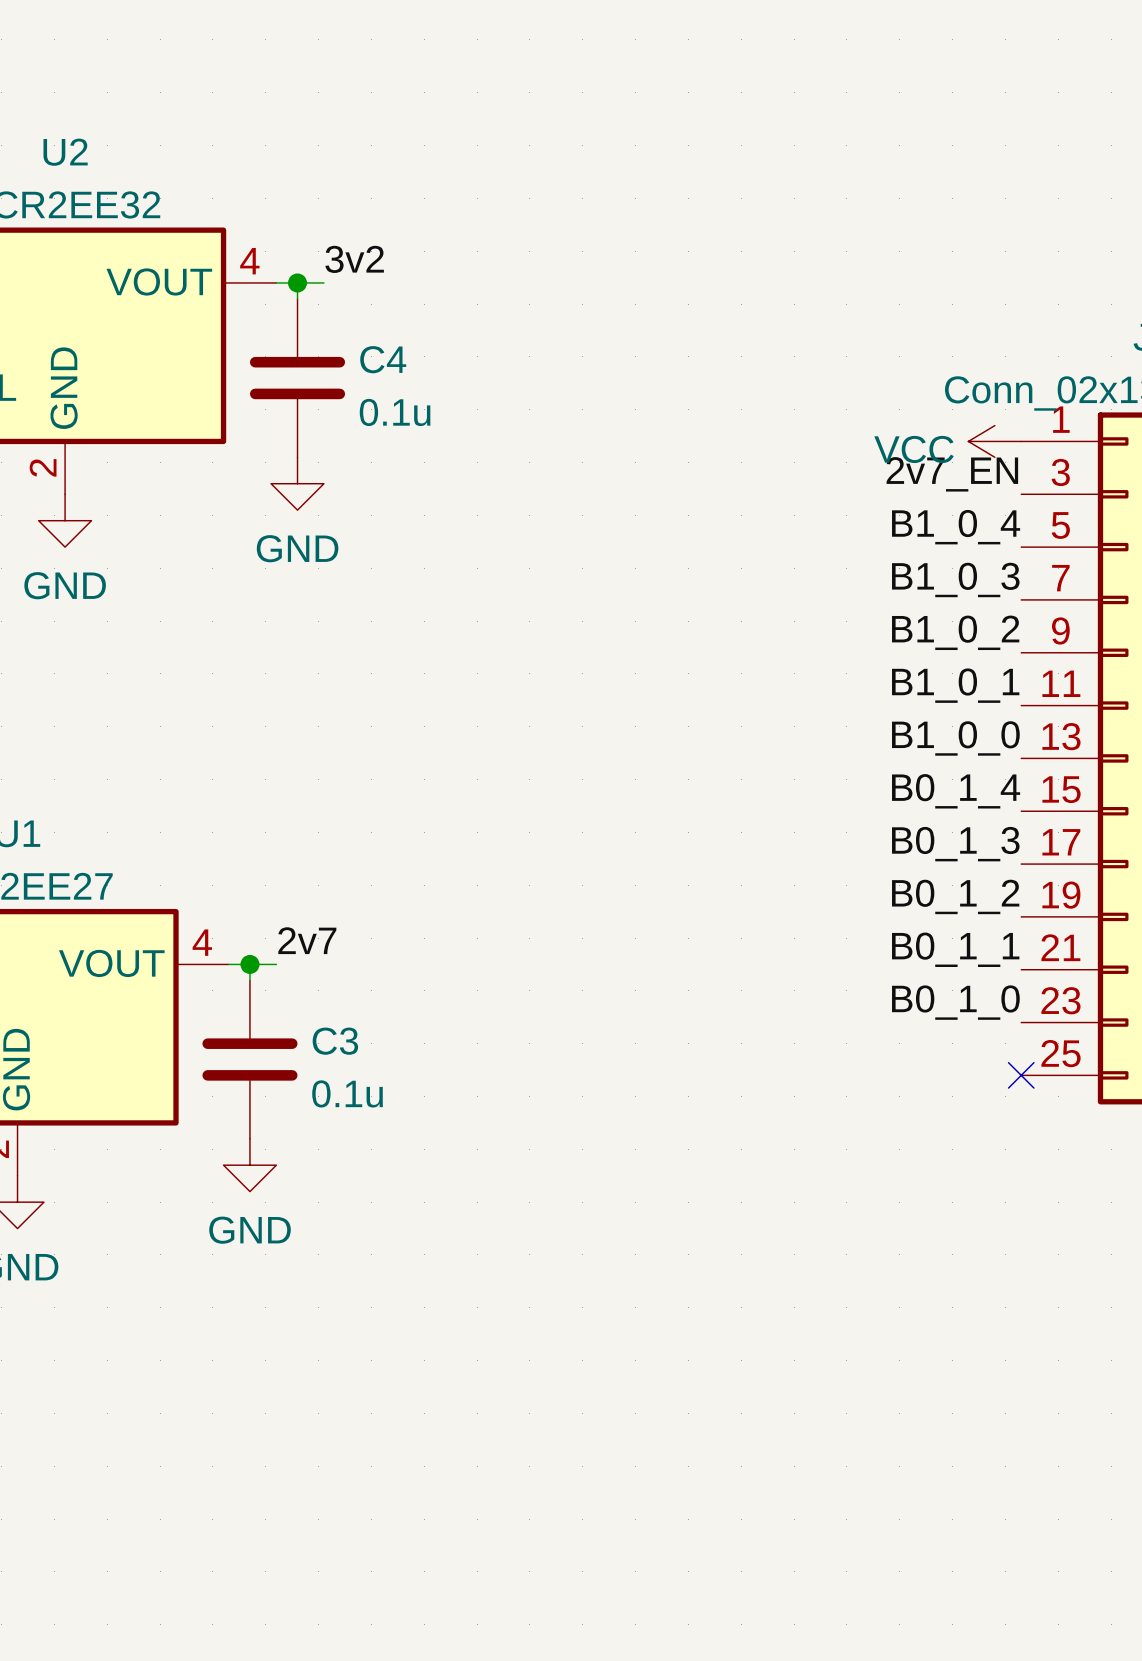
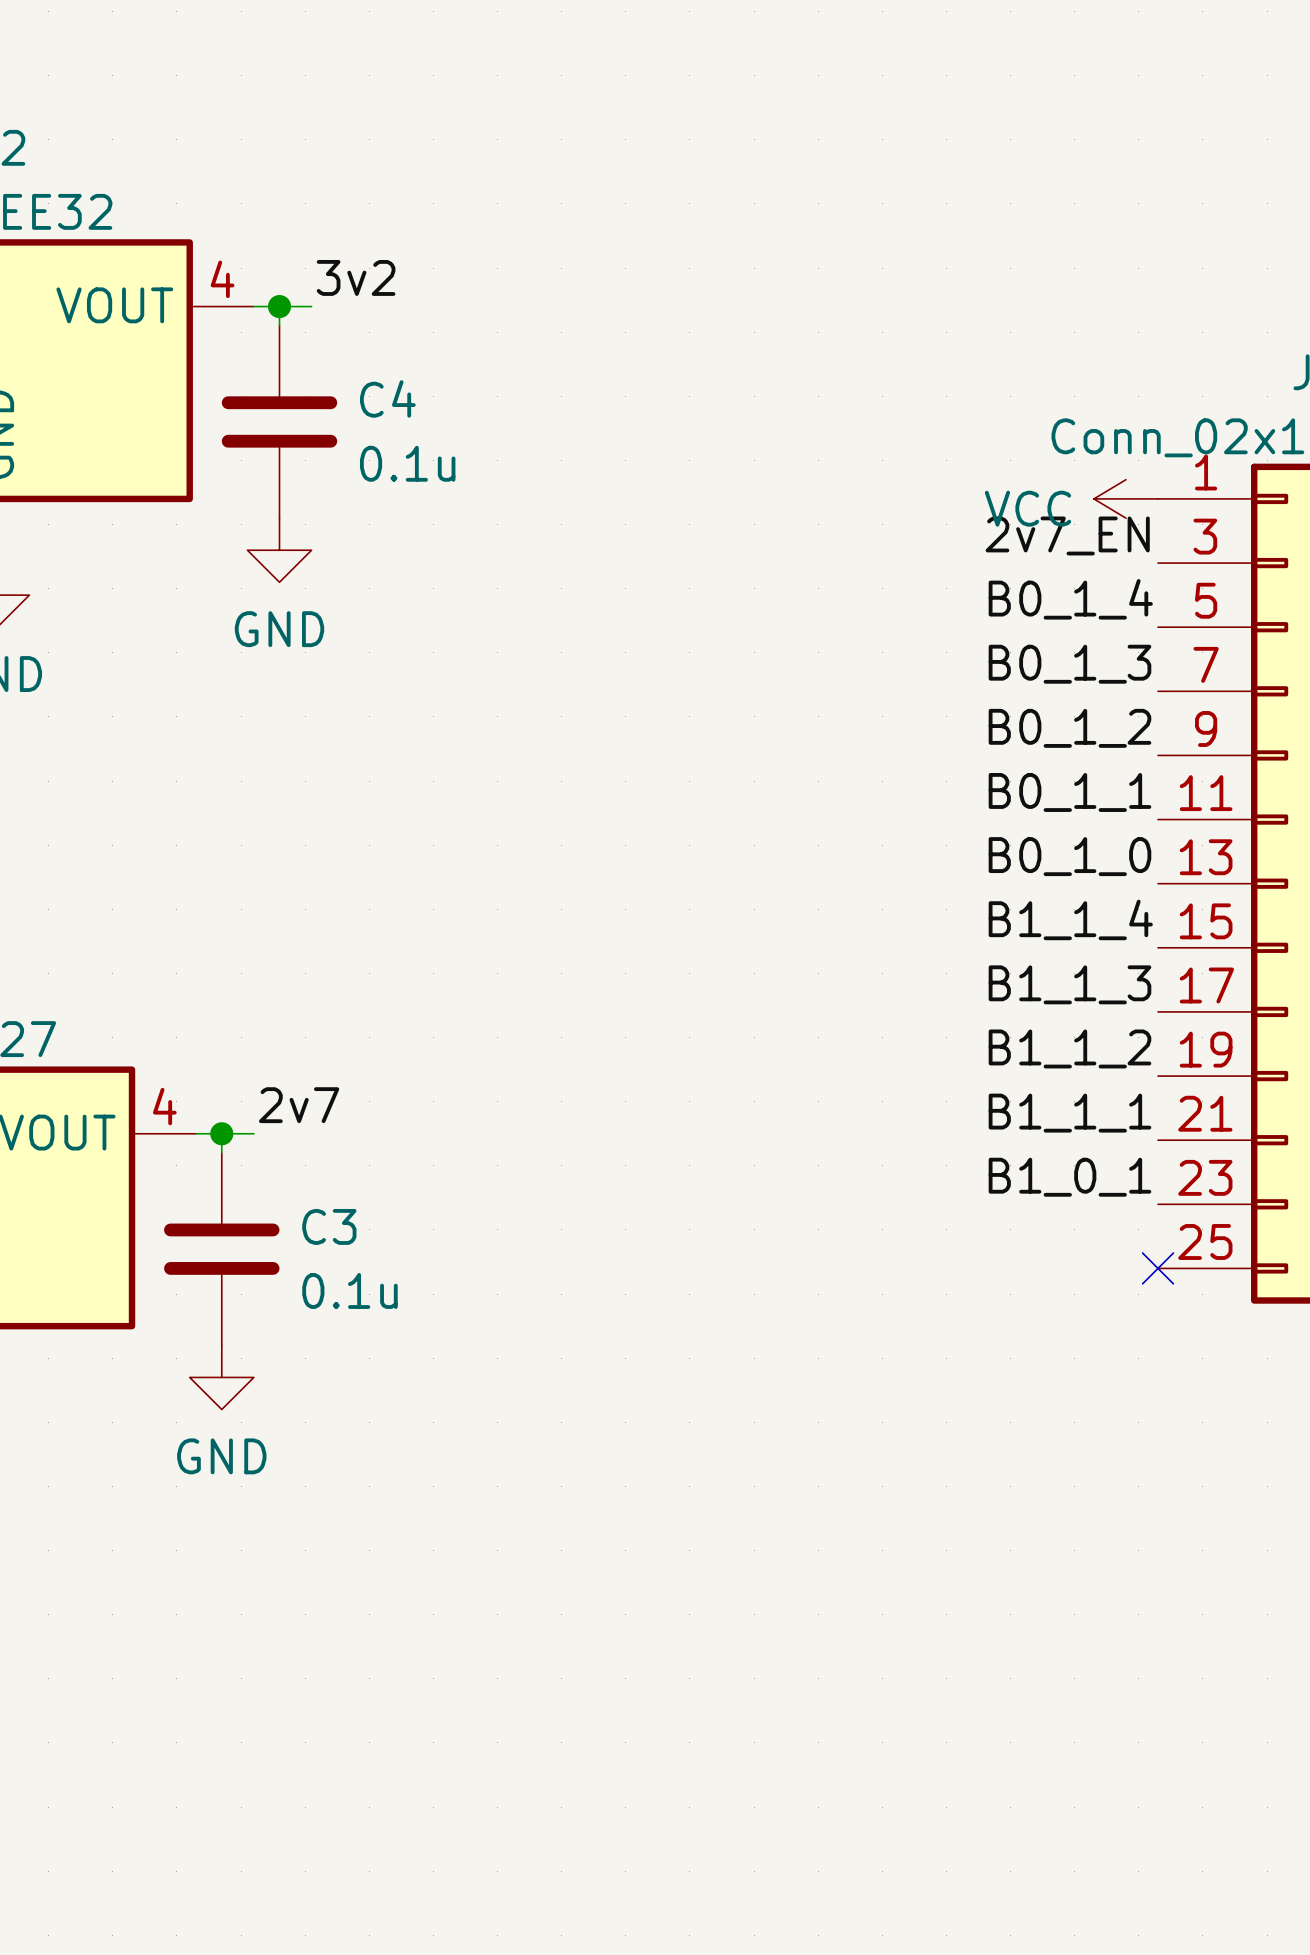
label: B1_0_4 (956, 527) -> B0_1_4 (1070, 599)
label: B1_0_3 (955, 579) -> B0_1_3 (1069, 664)
label: B1_0_2 (955, 632) -> B0_1_2 (1069, 728)
label: B1_0_1 (955, 685) -> B0_1_1 (1069, 792)
label: B1_0_0 (955, 738) -> B0_1_0 (1069, 856)
label: B0_1_4 (956, 791) -> B1_1_4 (1070, 919)
label: B0_1_3 (955, 844) -> B1_1_3 (1069, 984)
label: B0_1_2 (955, 896) -> B1_1_2 (1069, 1048)
label: B0_1_1 (955, 949) -> B1_1_1 (1069, 1113)
label: B0_1_0 (955, 1002) -> B1_0_1 (1069, 1177)

